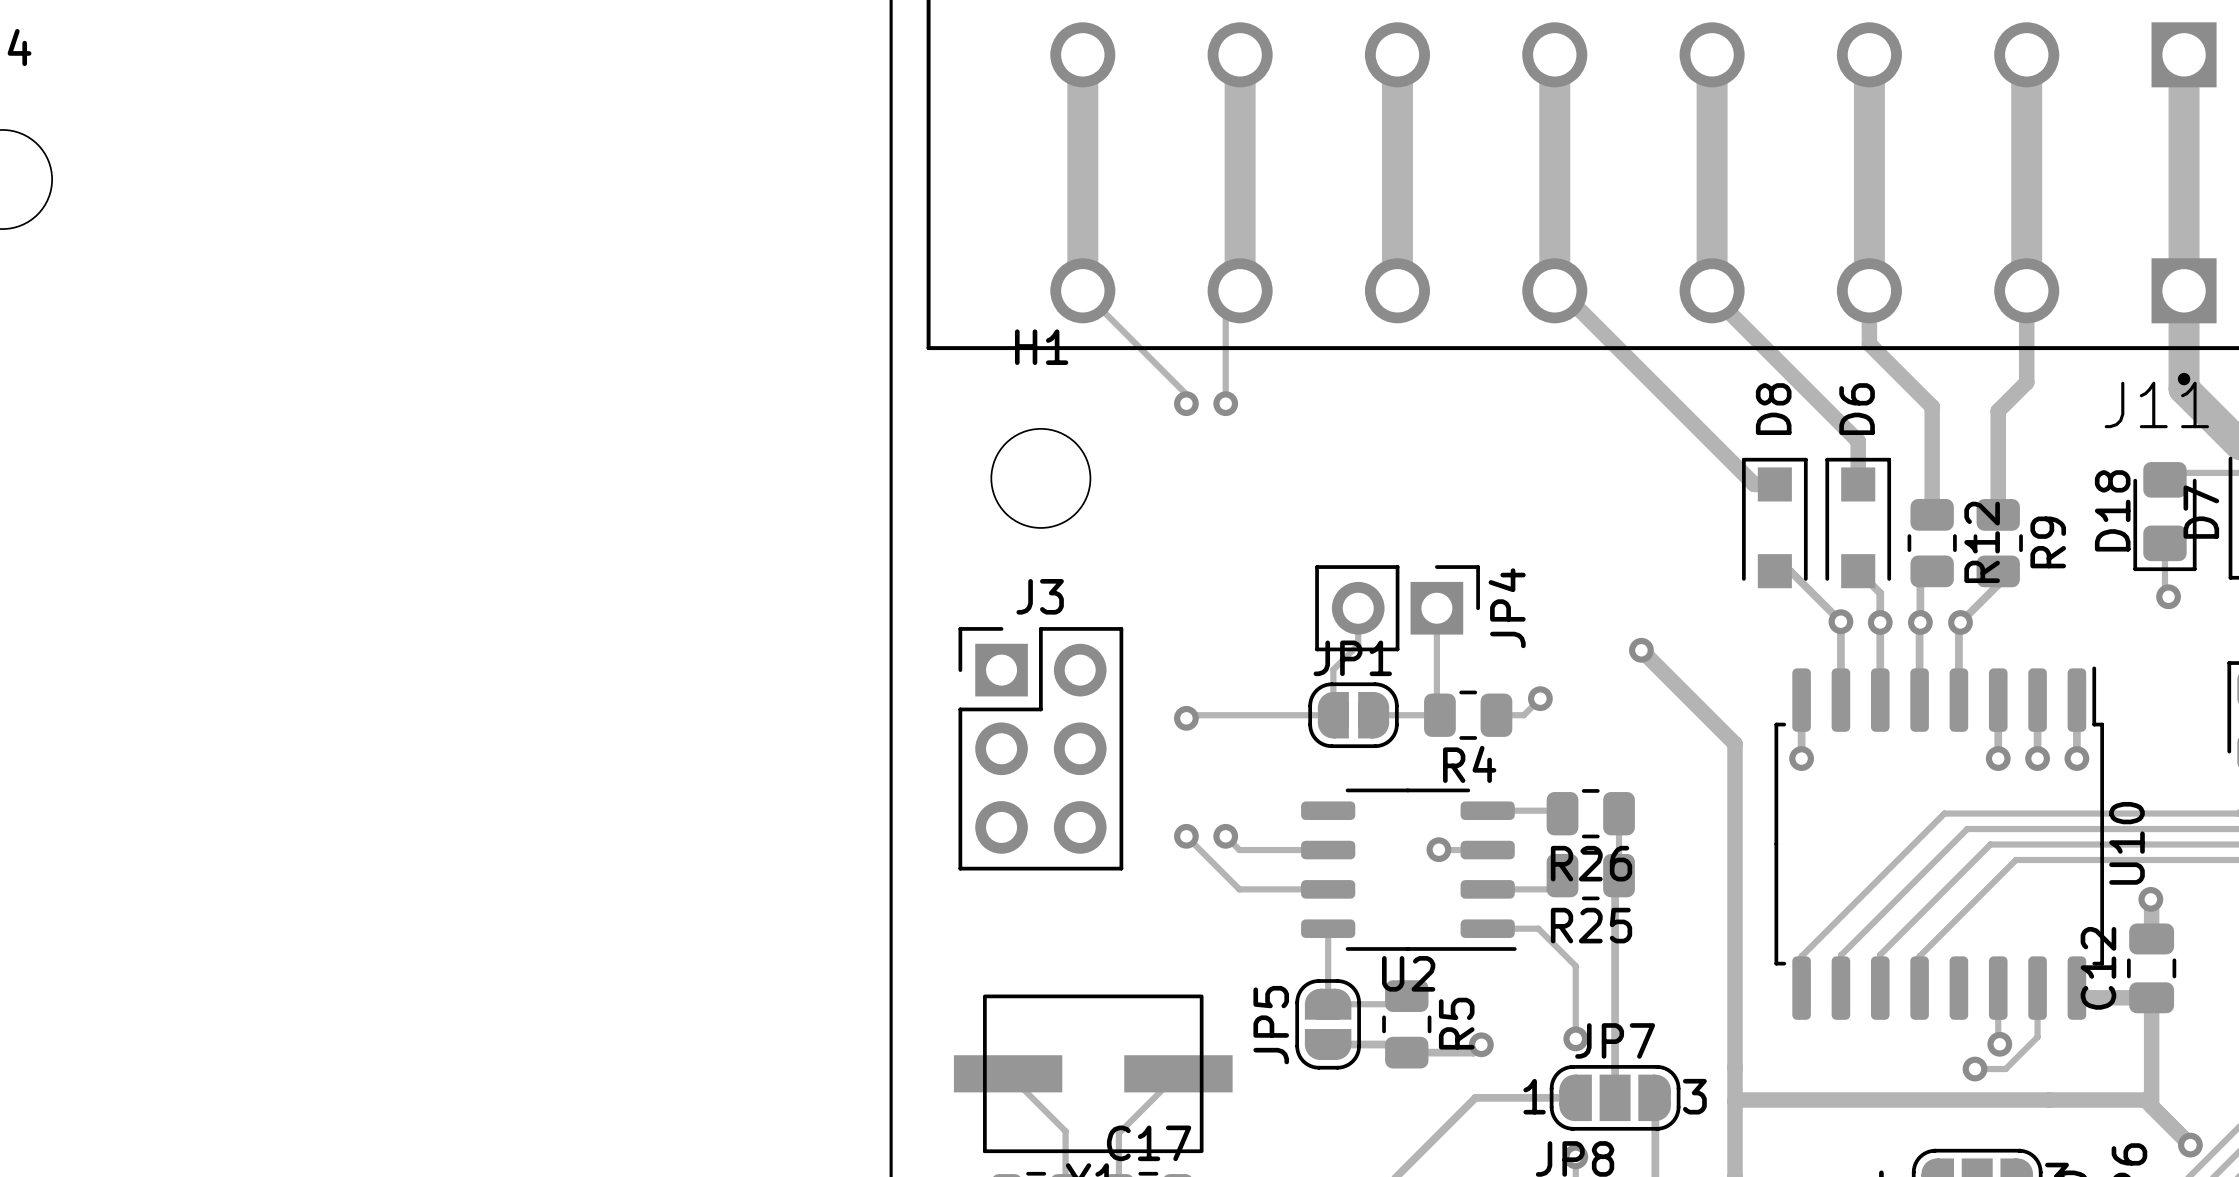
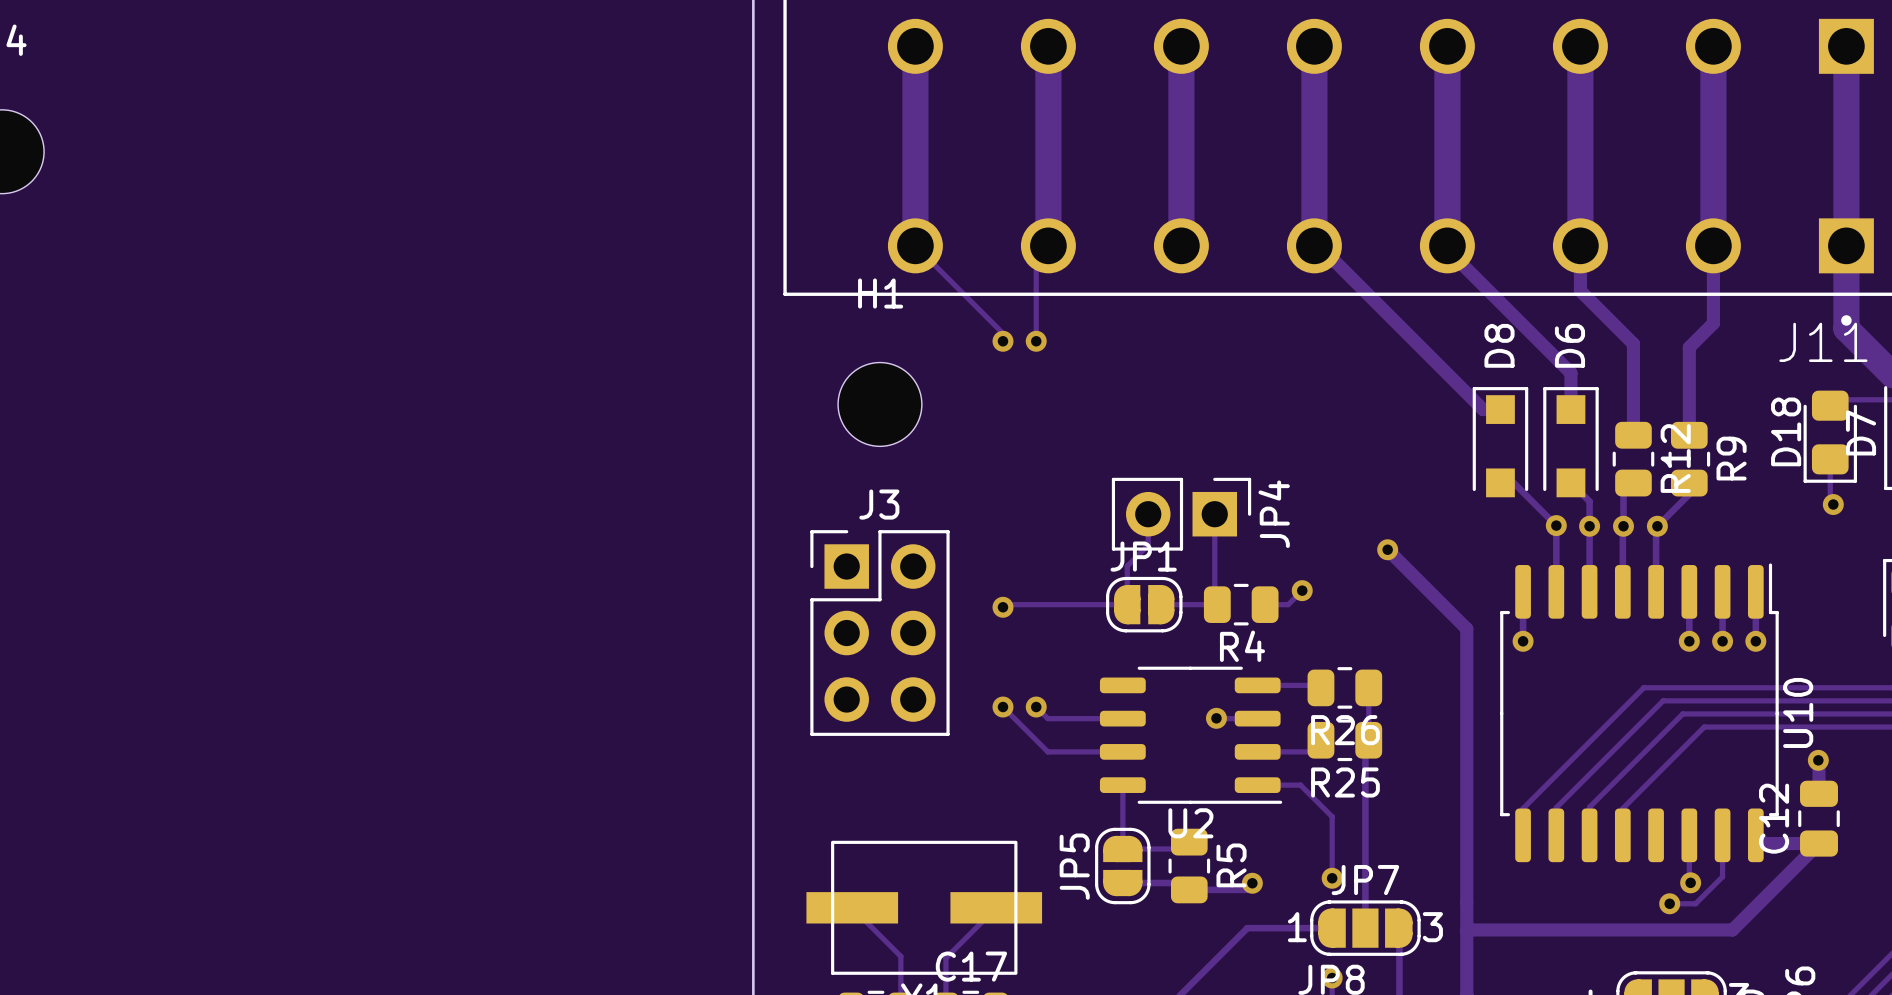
track: (2151, 997) (2151, 1106) -> (1819, 843) (1732, 929)
track: (2049, 1100) (2145, 1100) (2190, 1145) -> none
via: (2190, 1145) -> none

